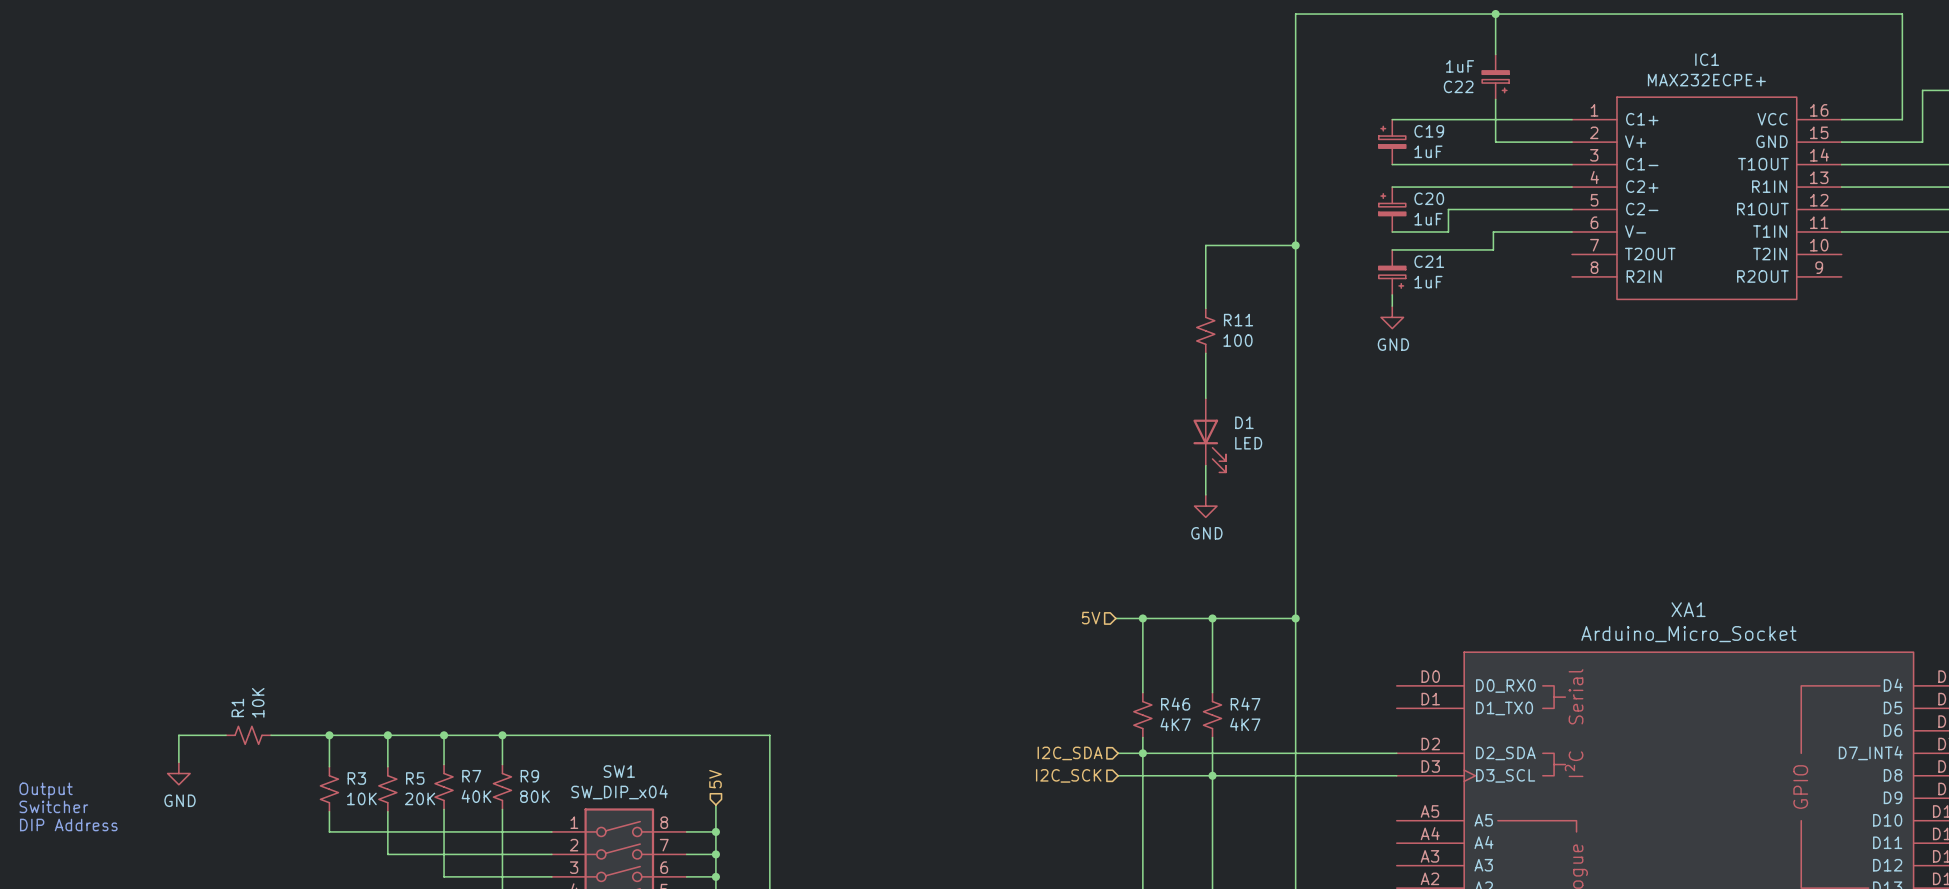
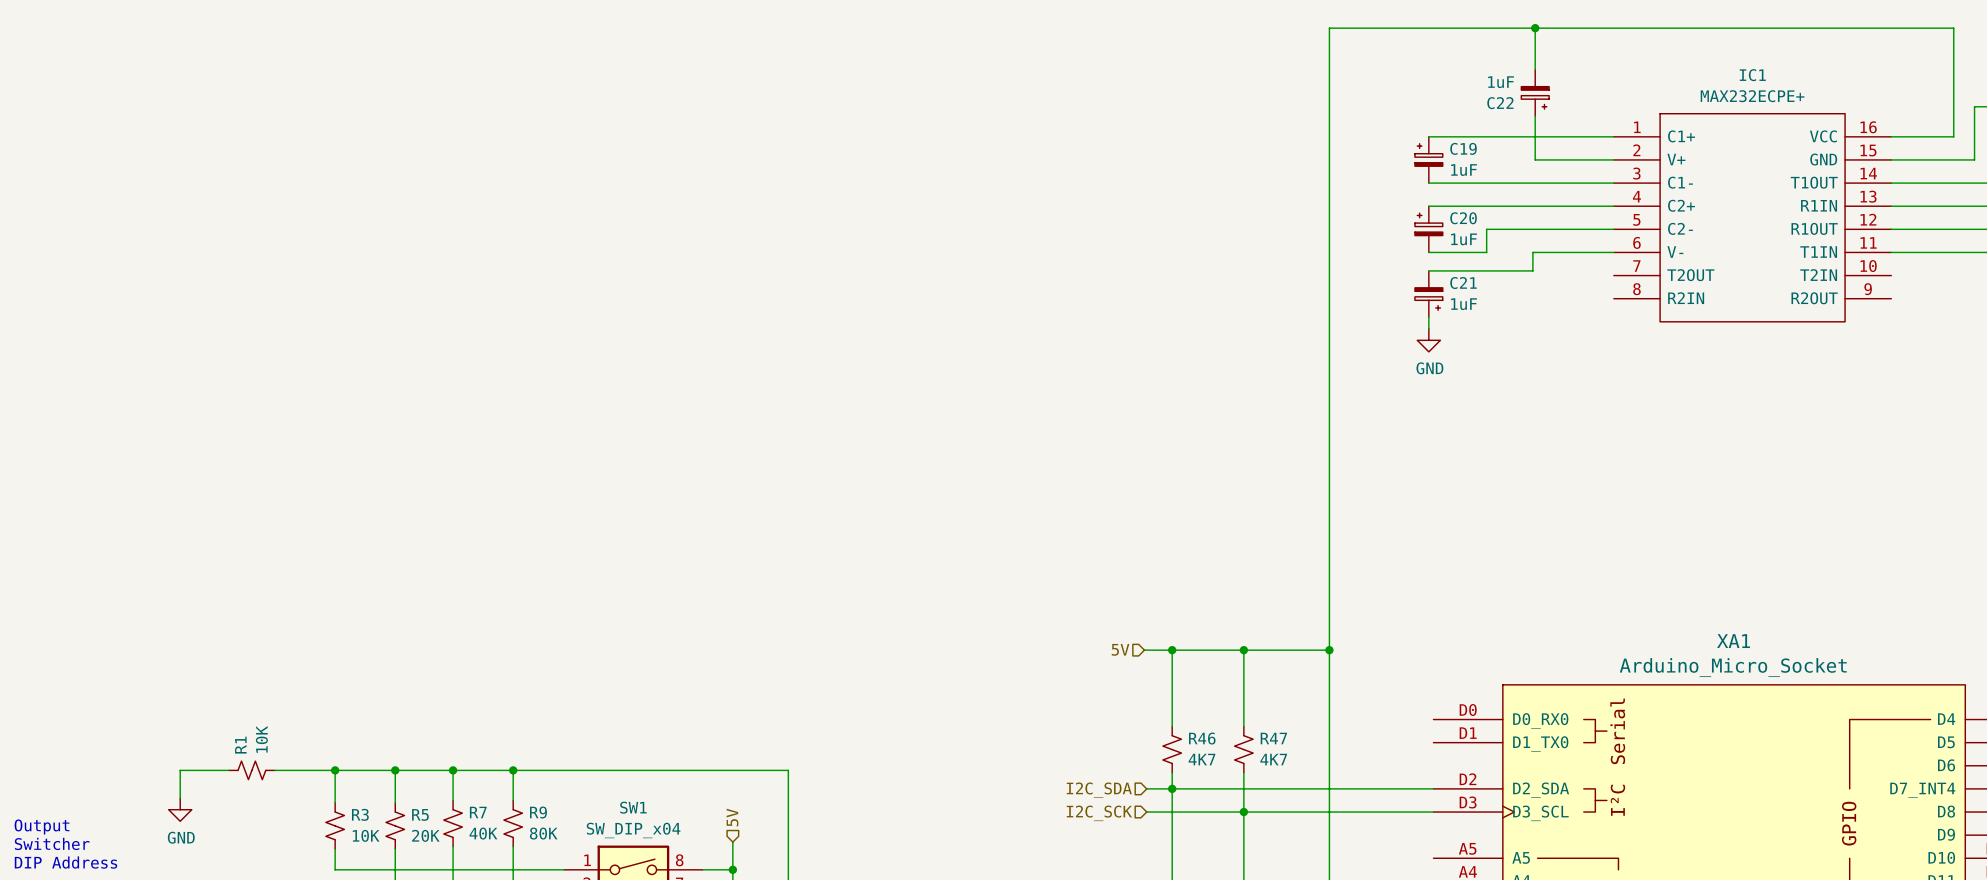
wire: (1295, 245) (1205, 245) (1205, 308) -> none
junction: (1295, 245) -> none
R11: 100 (1205, 330) -> none
wire: (1205, 353) (1205, 398) -> none
D1: LED (1209, 435) -> none
wire: (1205, 465) (1205, 494) -> none
power symbol: GND (1205, 506) -> none

